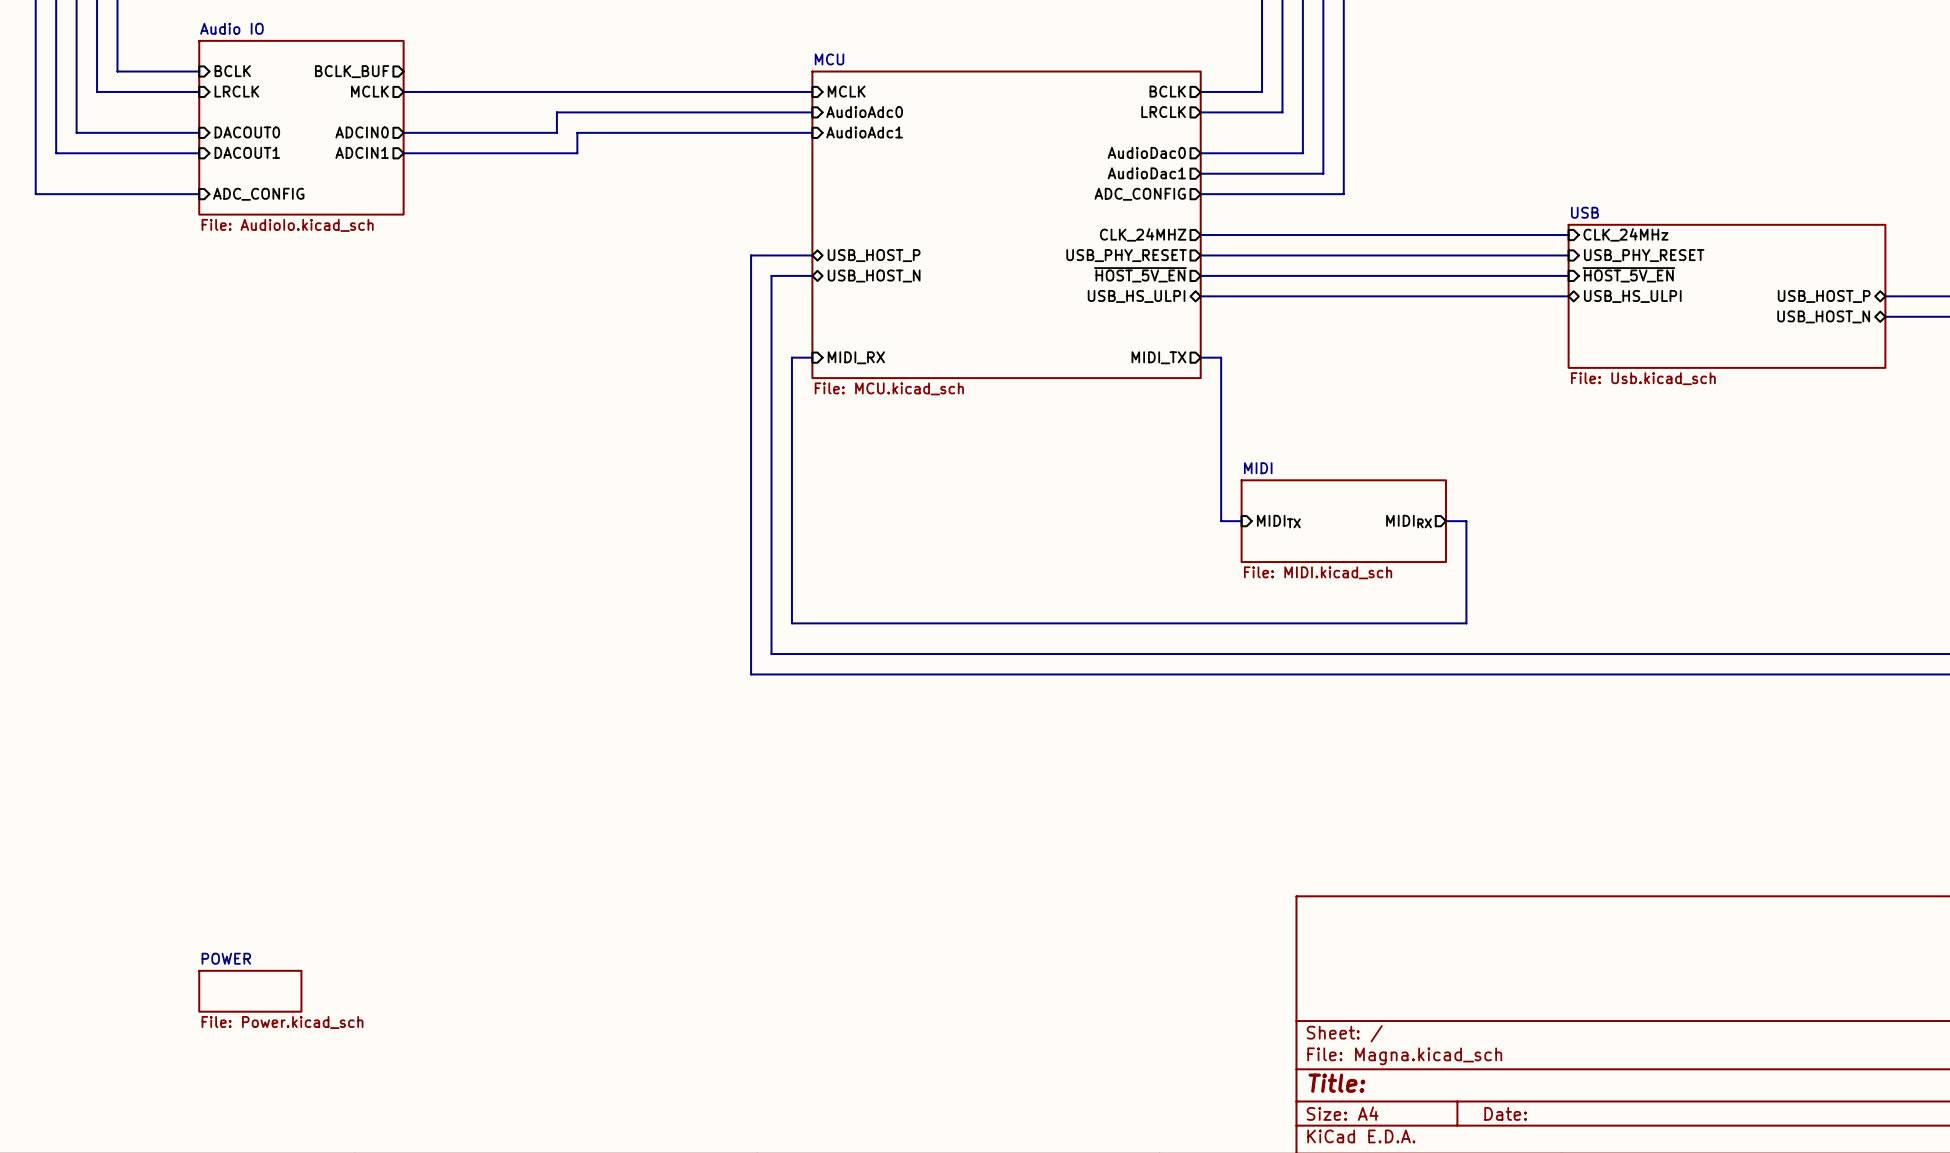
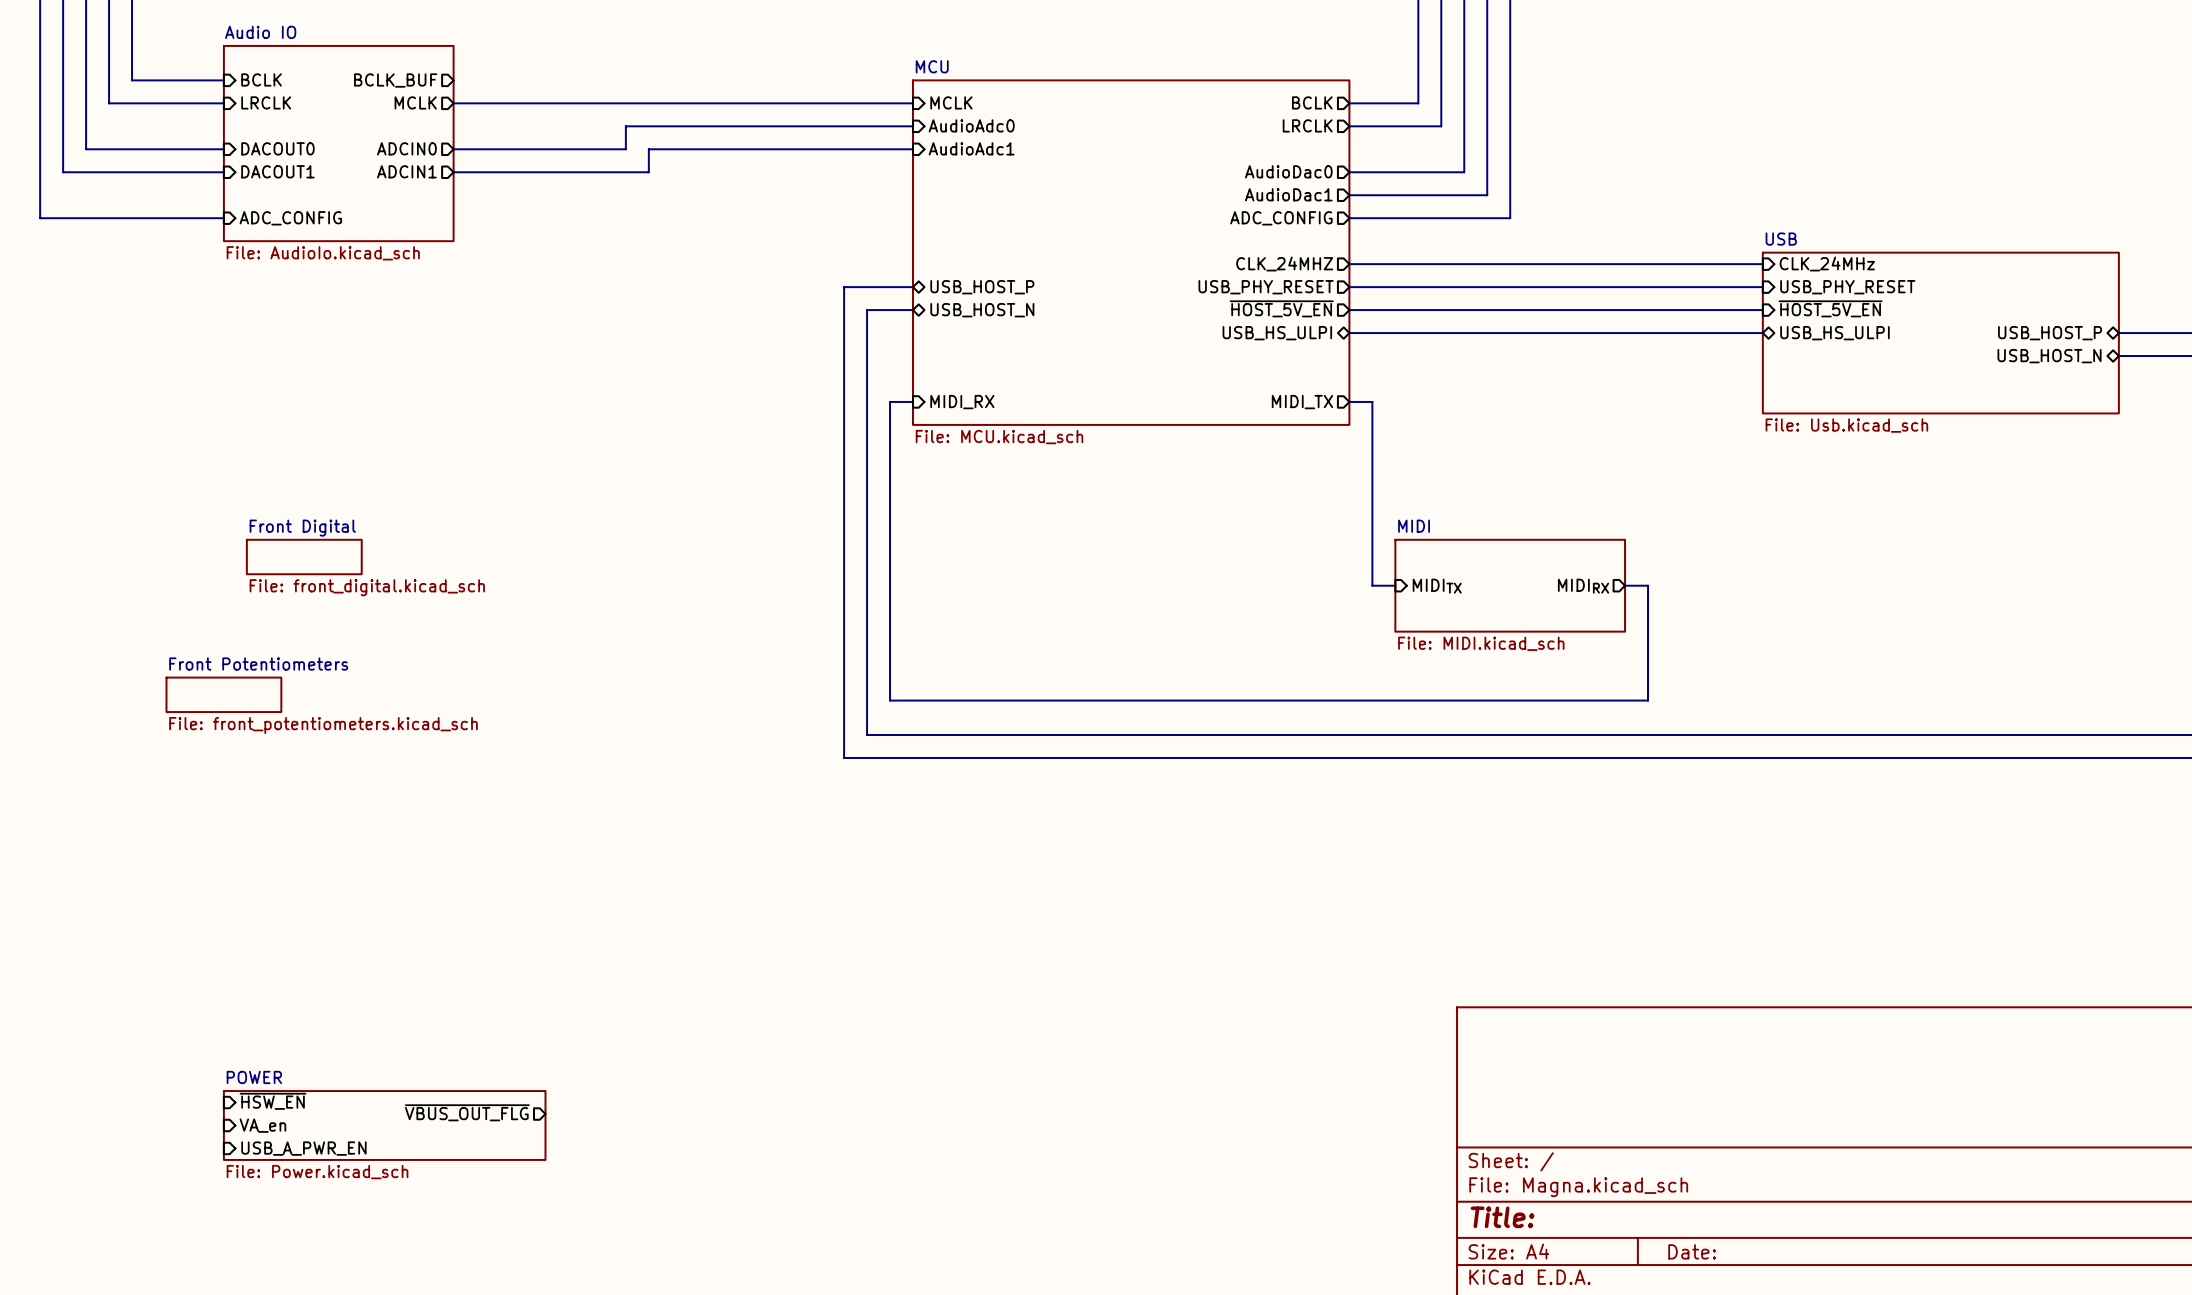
sheet Front Digital: none -> File: front_digital.kicad_sch (304, 557)
sheet Front Potentiometers: none -> File: front_potentiometers.kicad_sch (223, 694)
sheet pin: none -> ~{HSW_EN} (273, 1101)
sheet pin: none -> ~{VBUS_OUT_FLG} (467, 1112)
sheet POWER: File: Power.kicad_sch (250, 991) -> none
sheet pin: none -> VA_en (262, 1125)
sheet POWER: none -> File: Power.kicad_sch (384, 1125)
sheet pin: none -> USB_A_PWR_EN (303, 1148)

